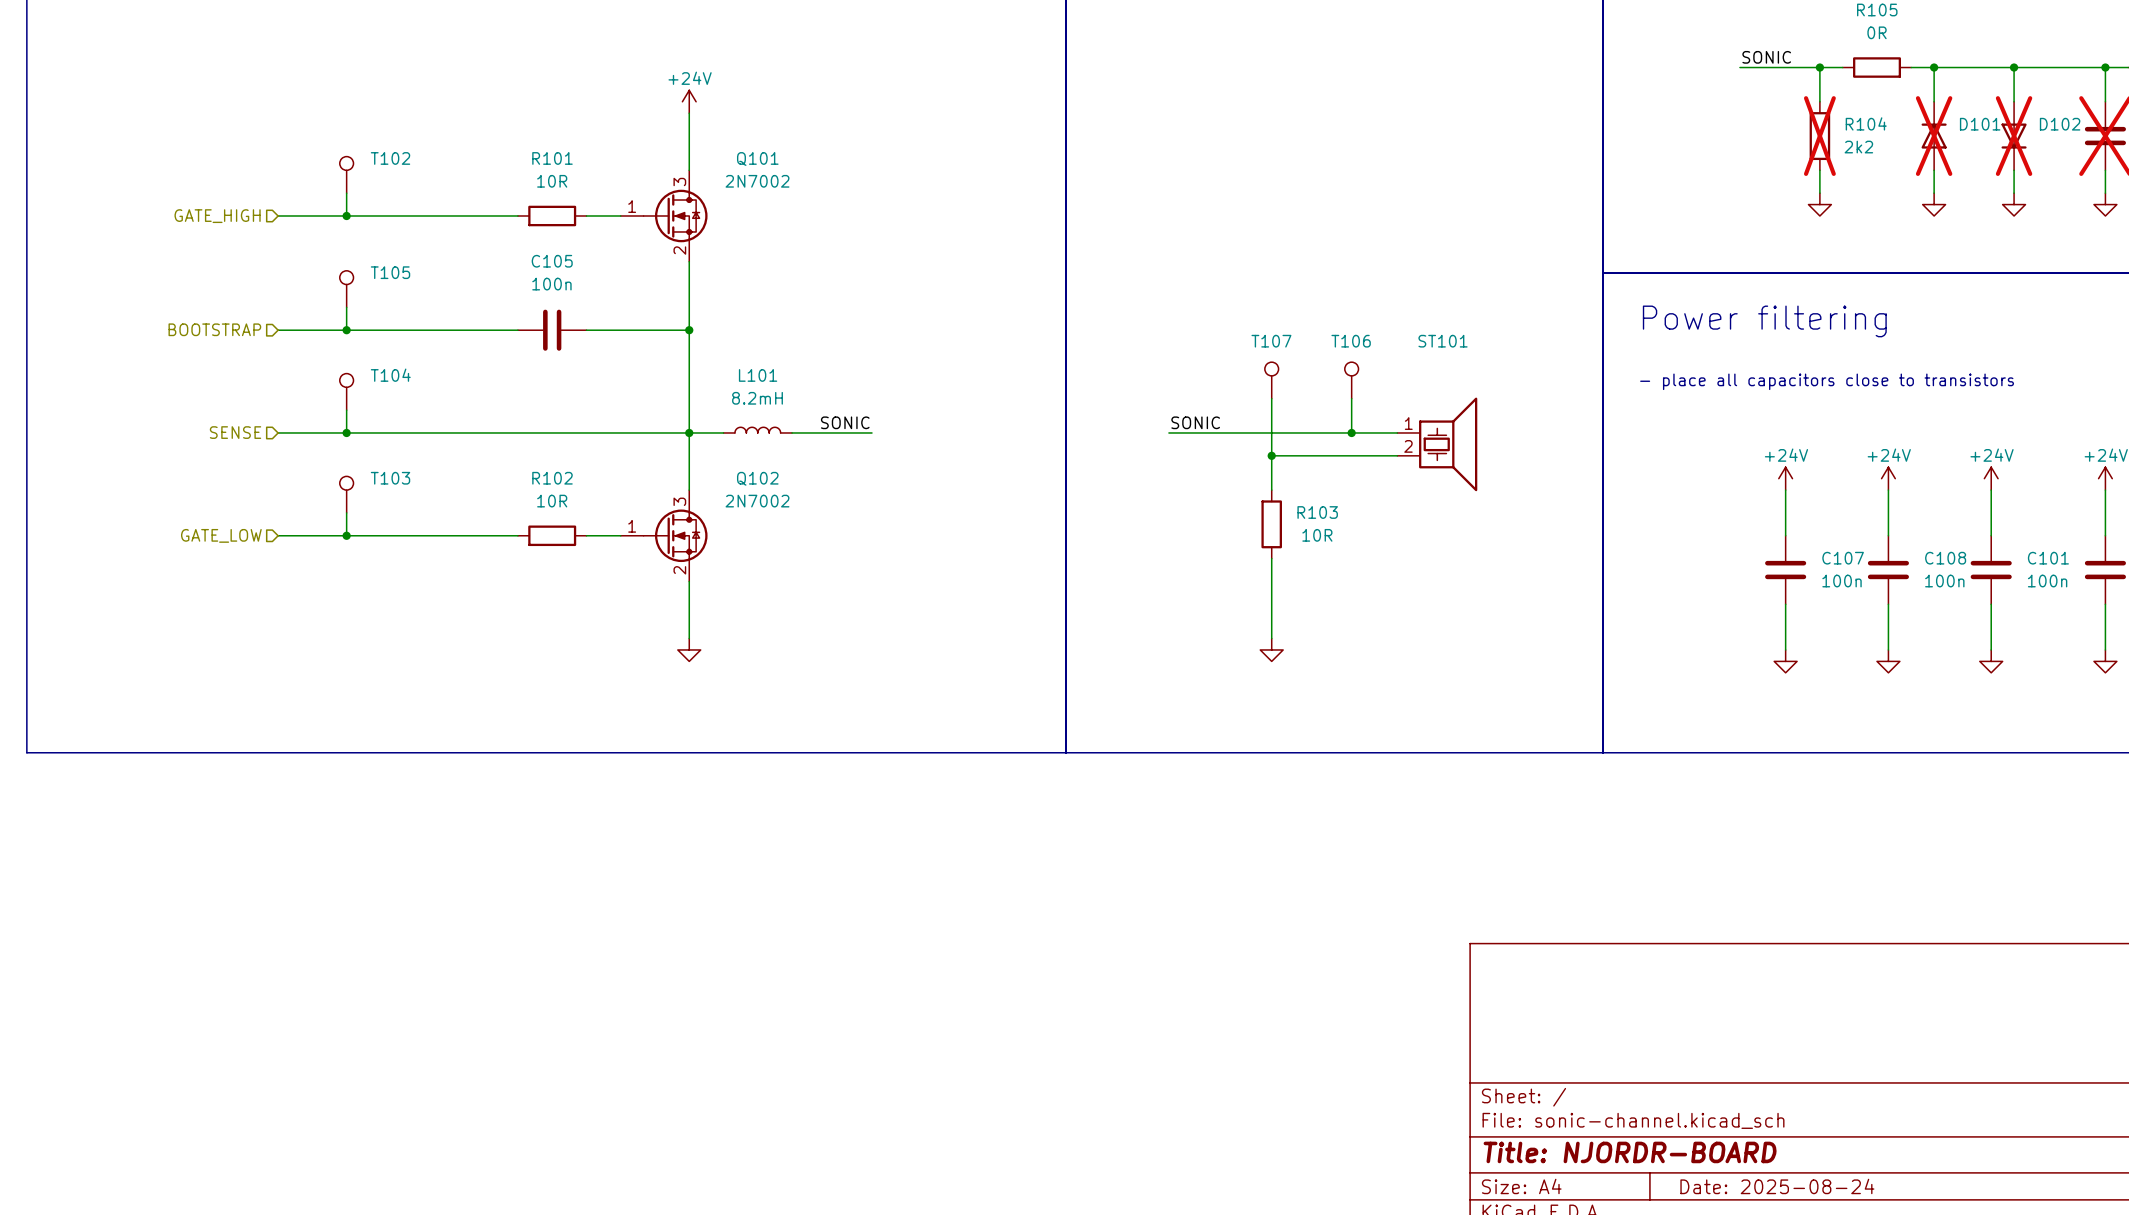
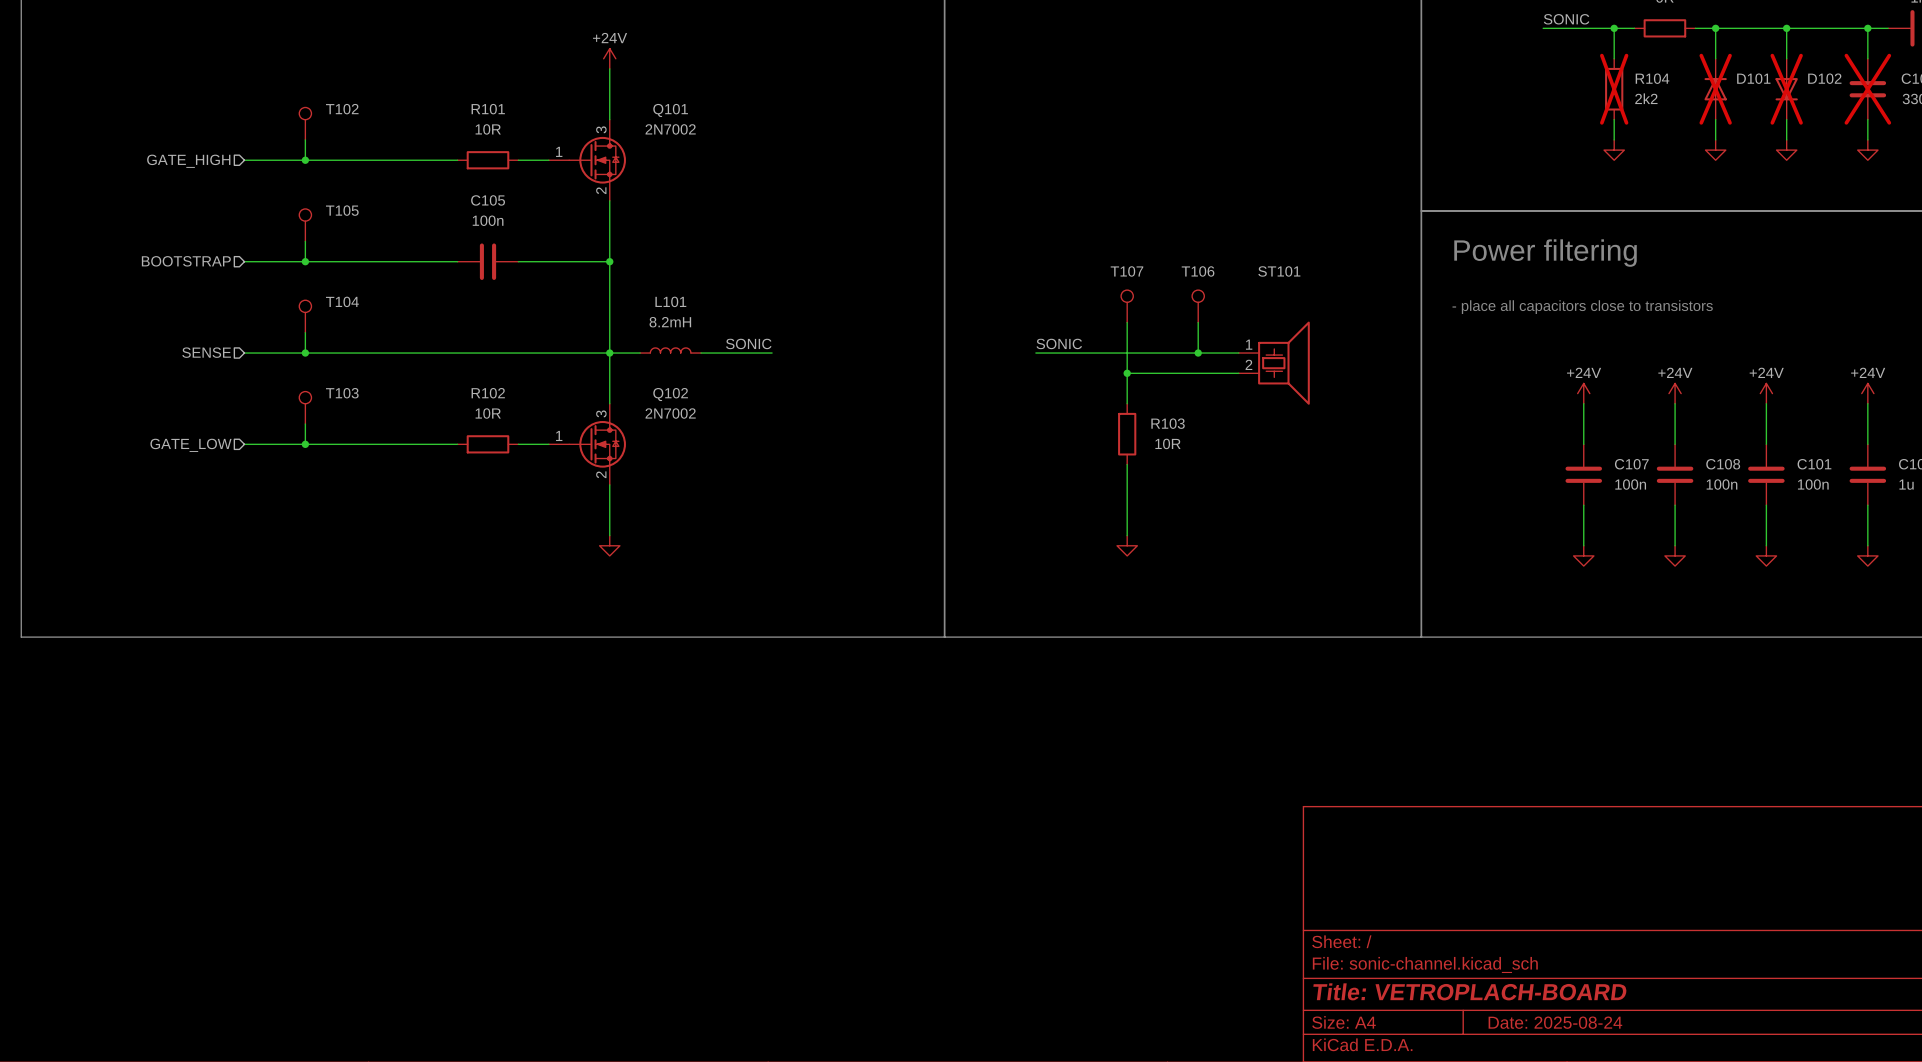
title block: Title: NJORDR-BOARD (1630, 1152) -> Title: VETROPLACH-BOARD (1470, 991)

